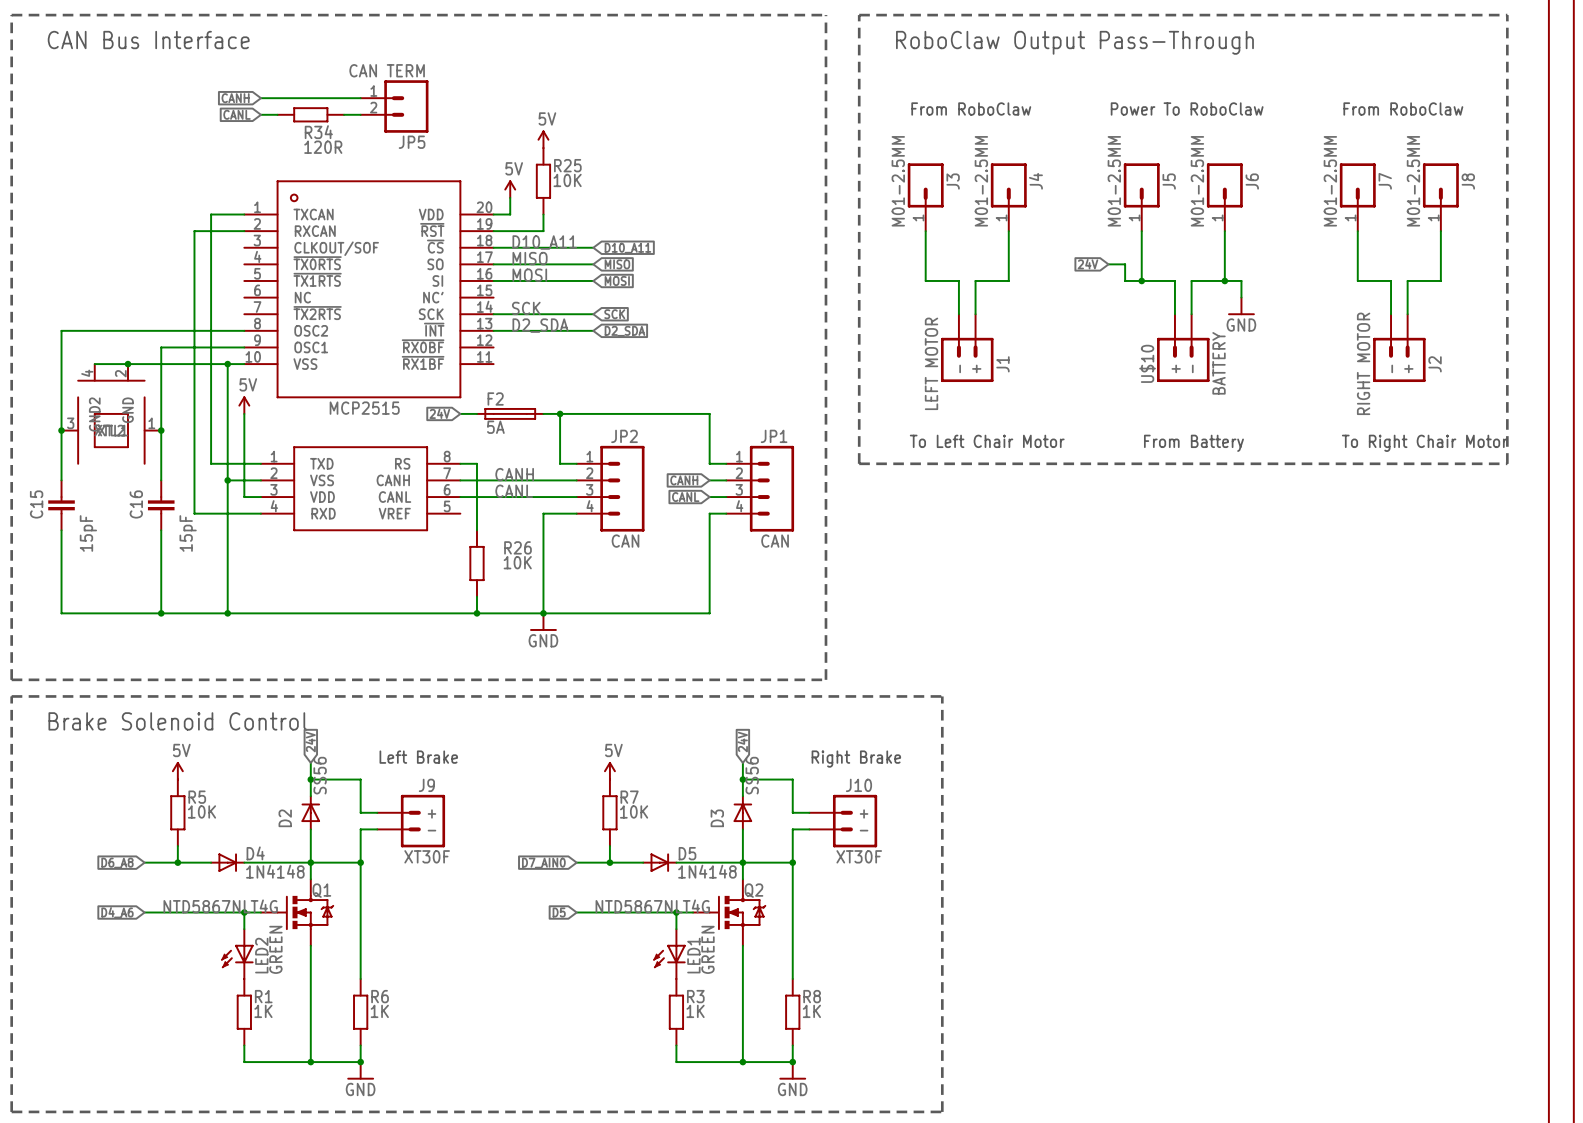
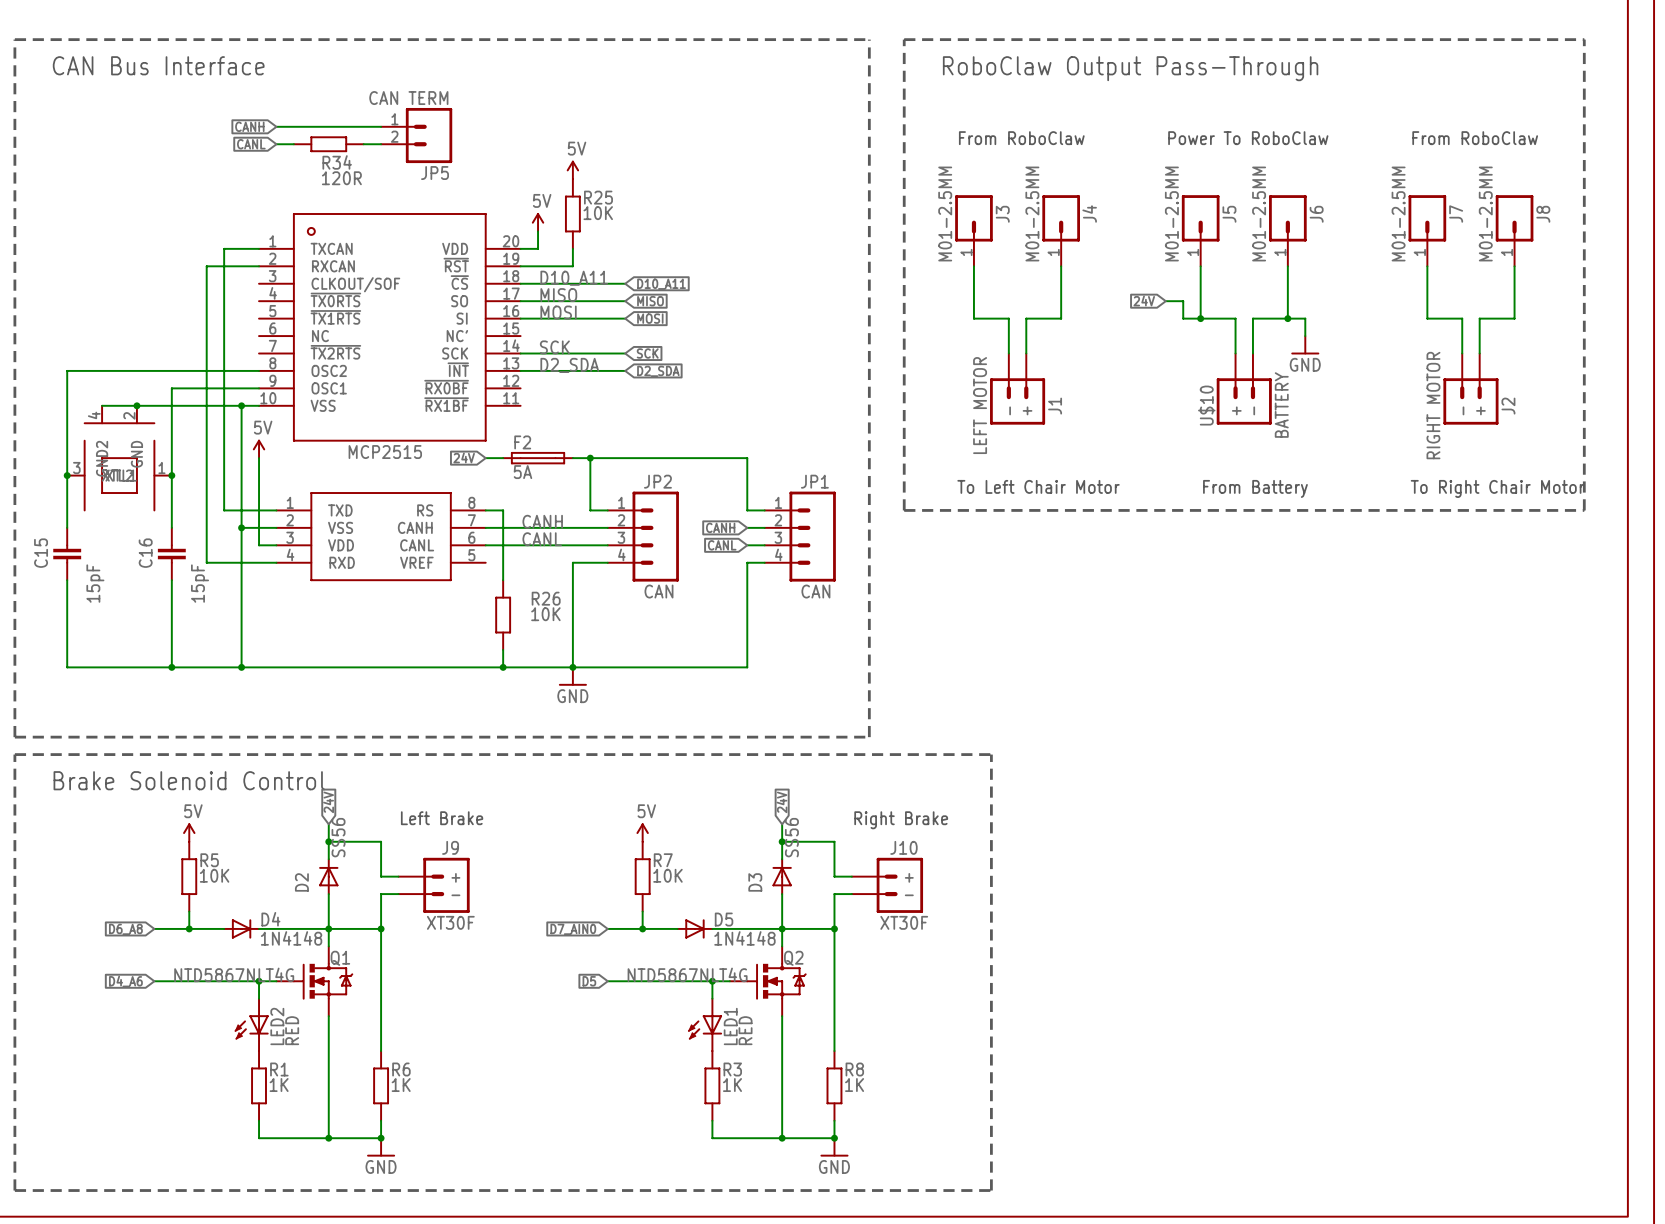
LED2 value: GREEN (275, 949) -> RED (292, 1030)
LED1 value: GREEN (707, 949) -> RED (745, 1030)

